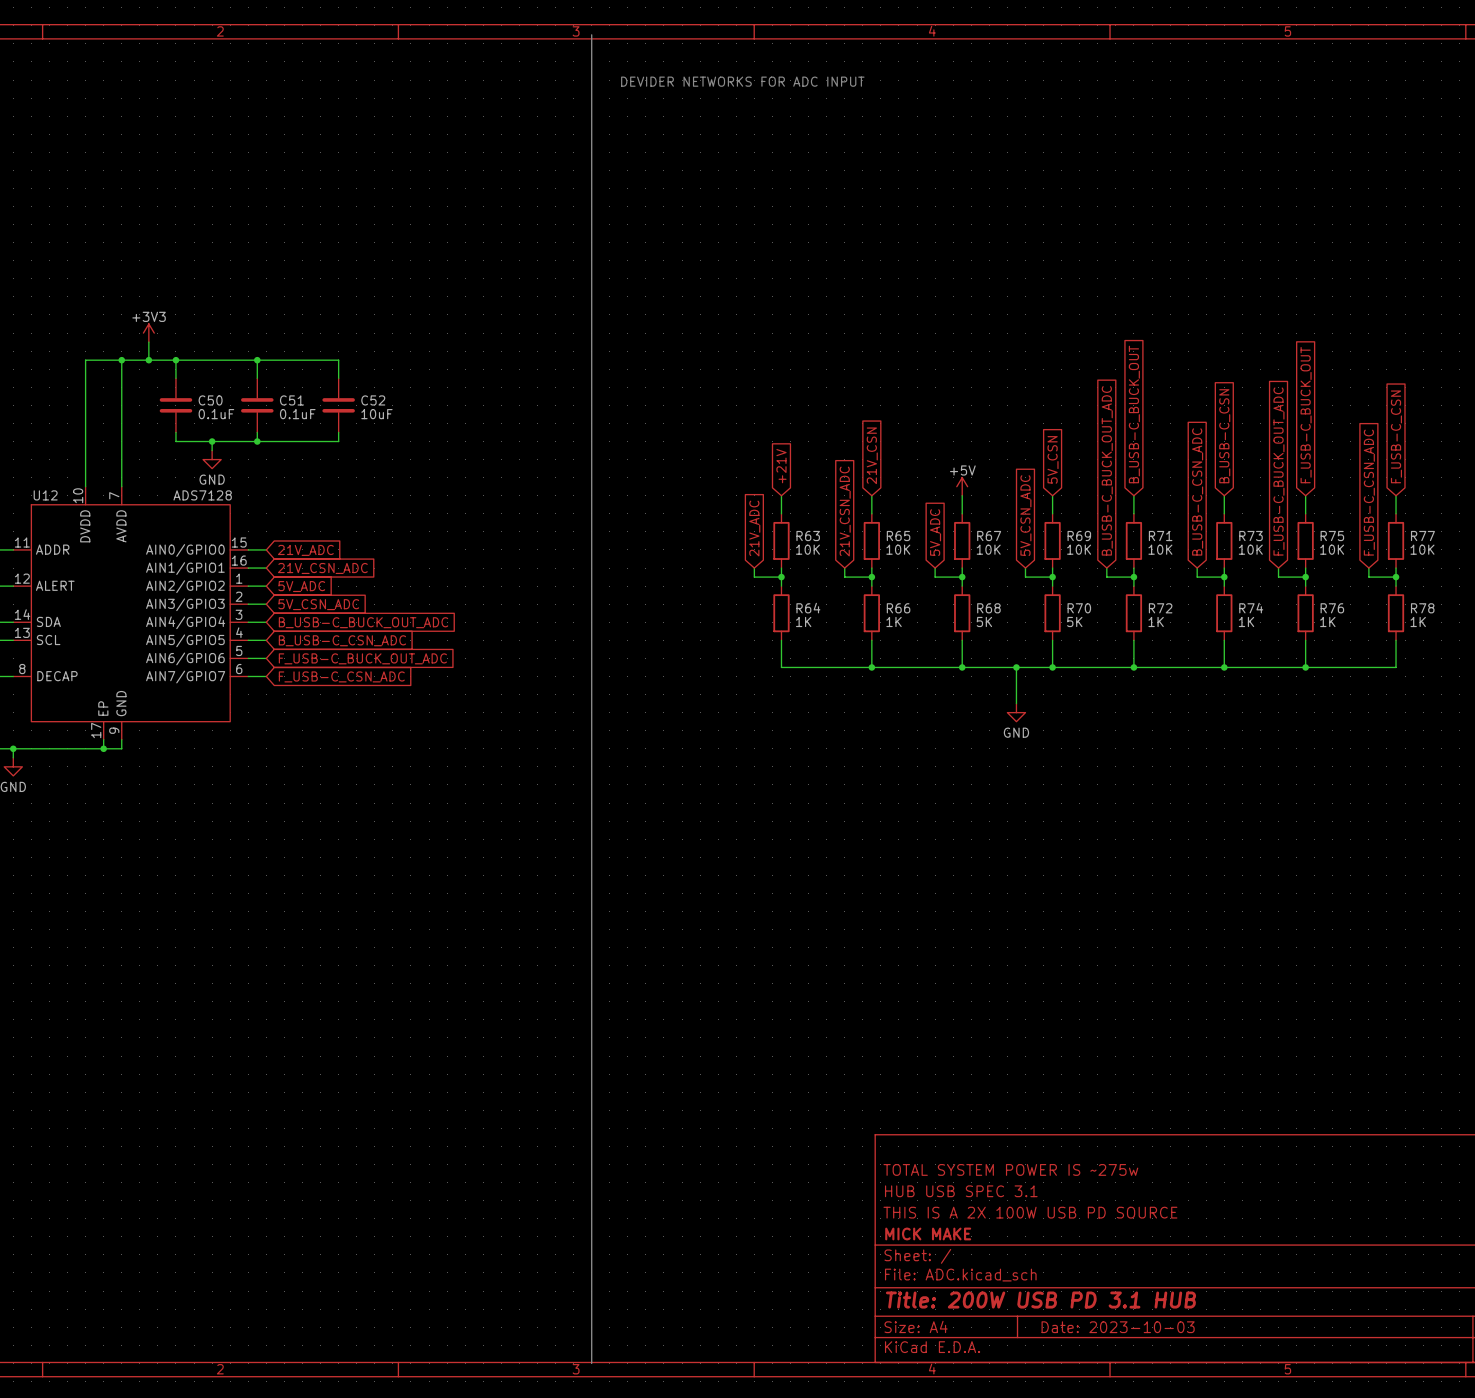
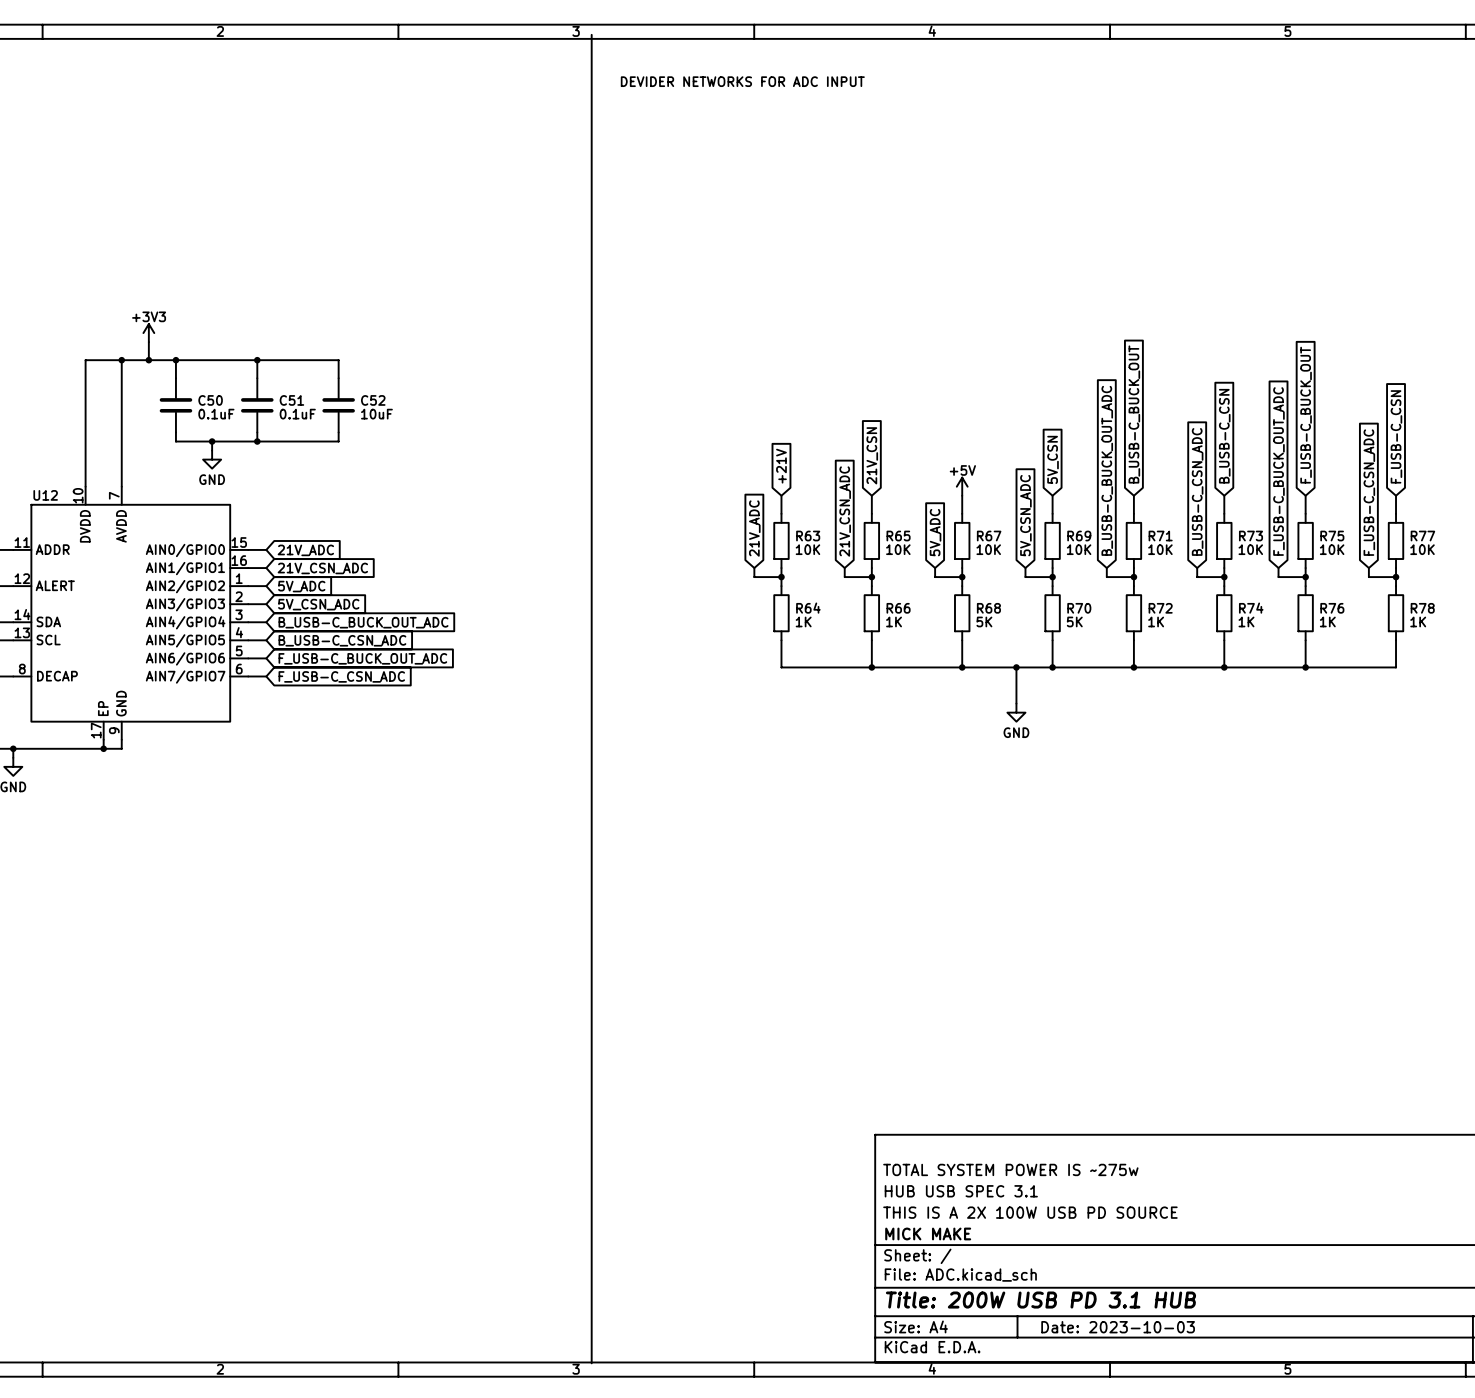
U12 value: ADS7128 (202, 495) -> none

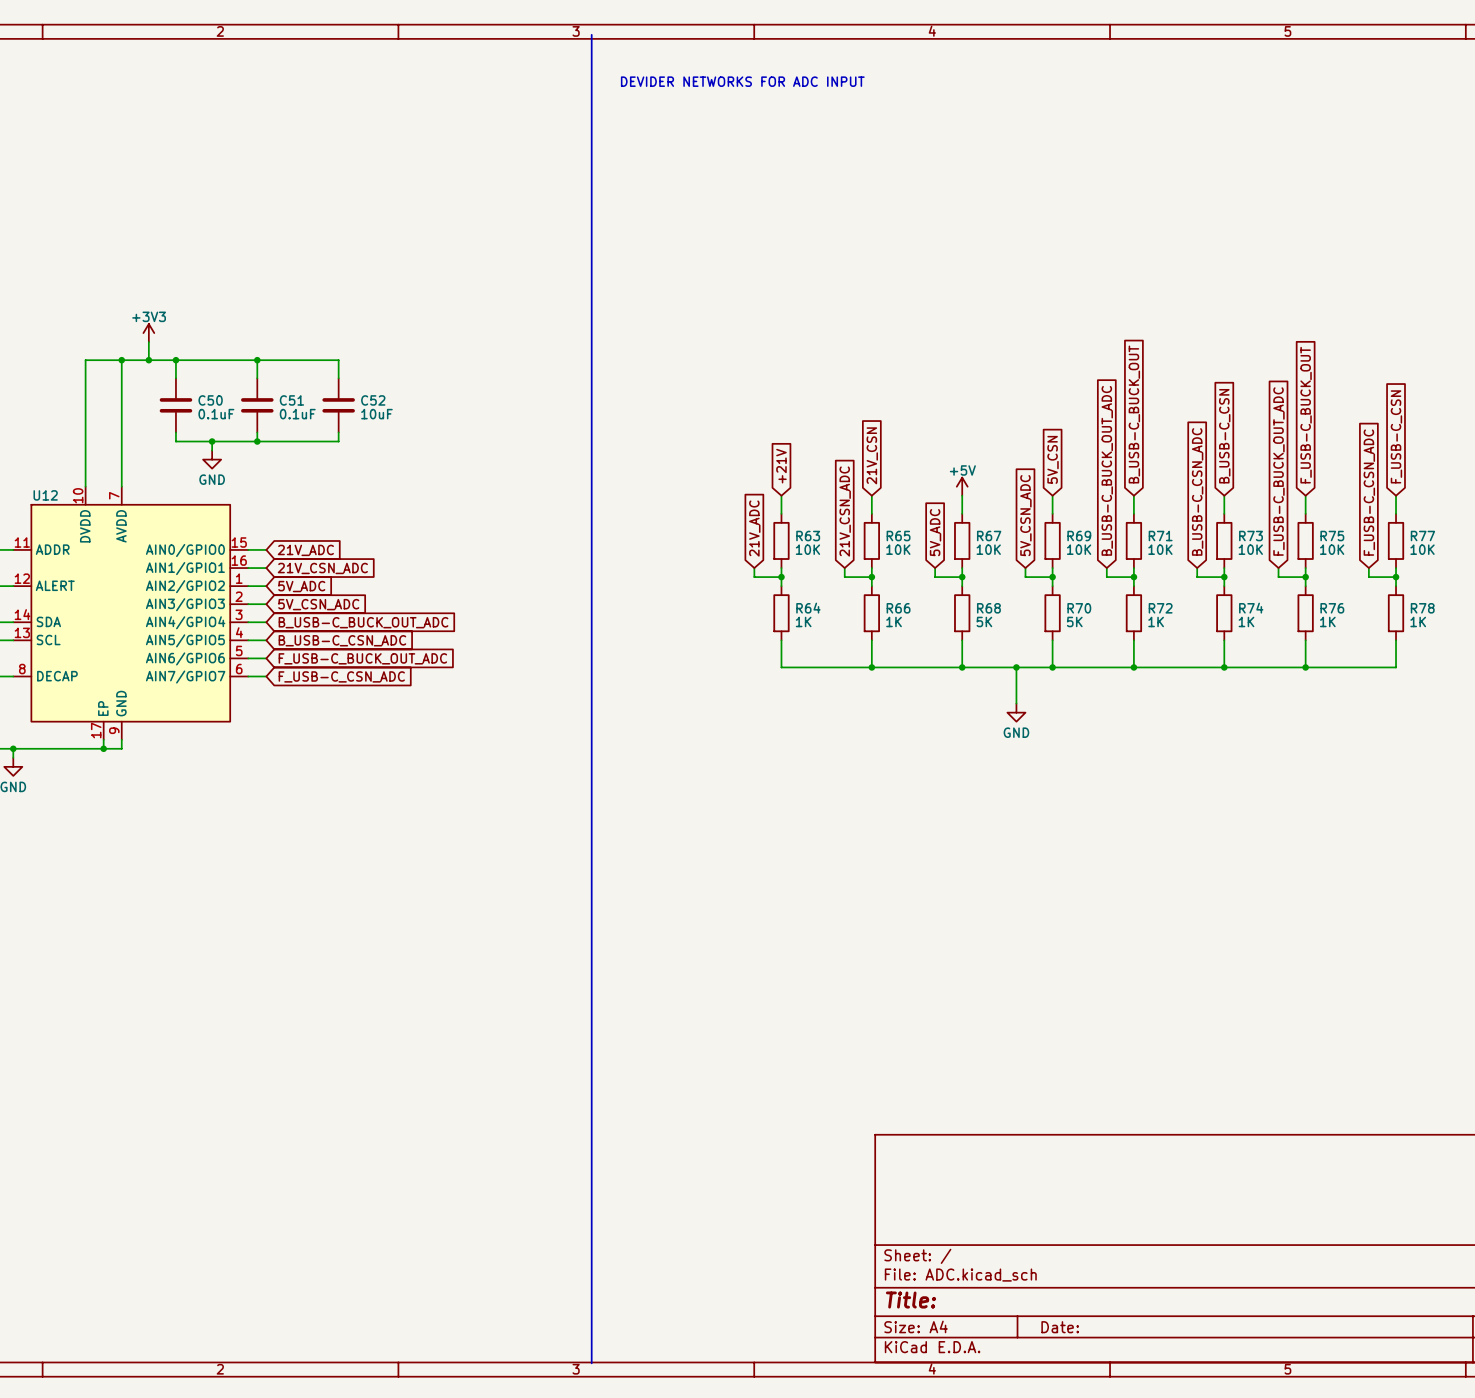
title block: TOTAL SYSTEM POWER IS ~275w (1010, 1169) -> none
title block: HUB USB SPEC 3.1 (961, 1191) -> none
title block: THIS IS A 2X 100W USB PD SOURCE (1030, 1212) -> none
title block: MICK MAKE (928, 1233) -> none
title block: Title: 200W USB PD 3.1 HUB (1040, 1300) -> Title: (910, 1300)
title block: Date: 2023-10-03 (1118, 1327) -> Date: (1060, 1327)

